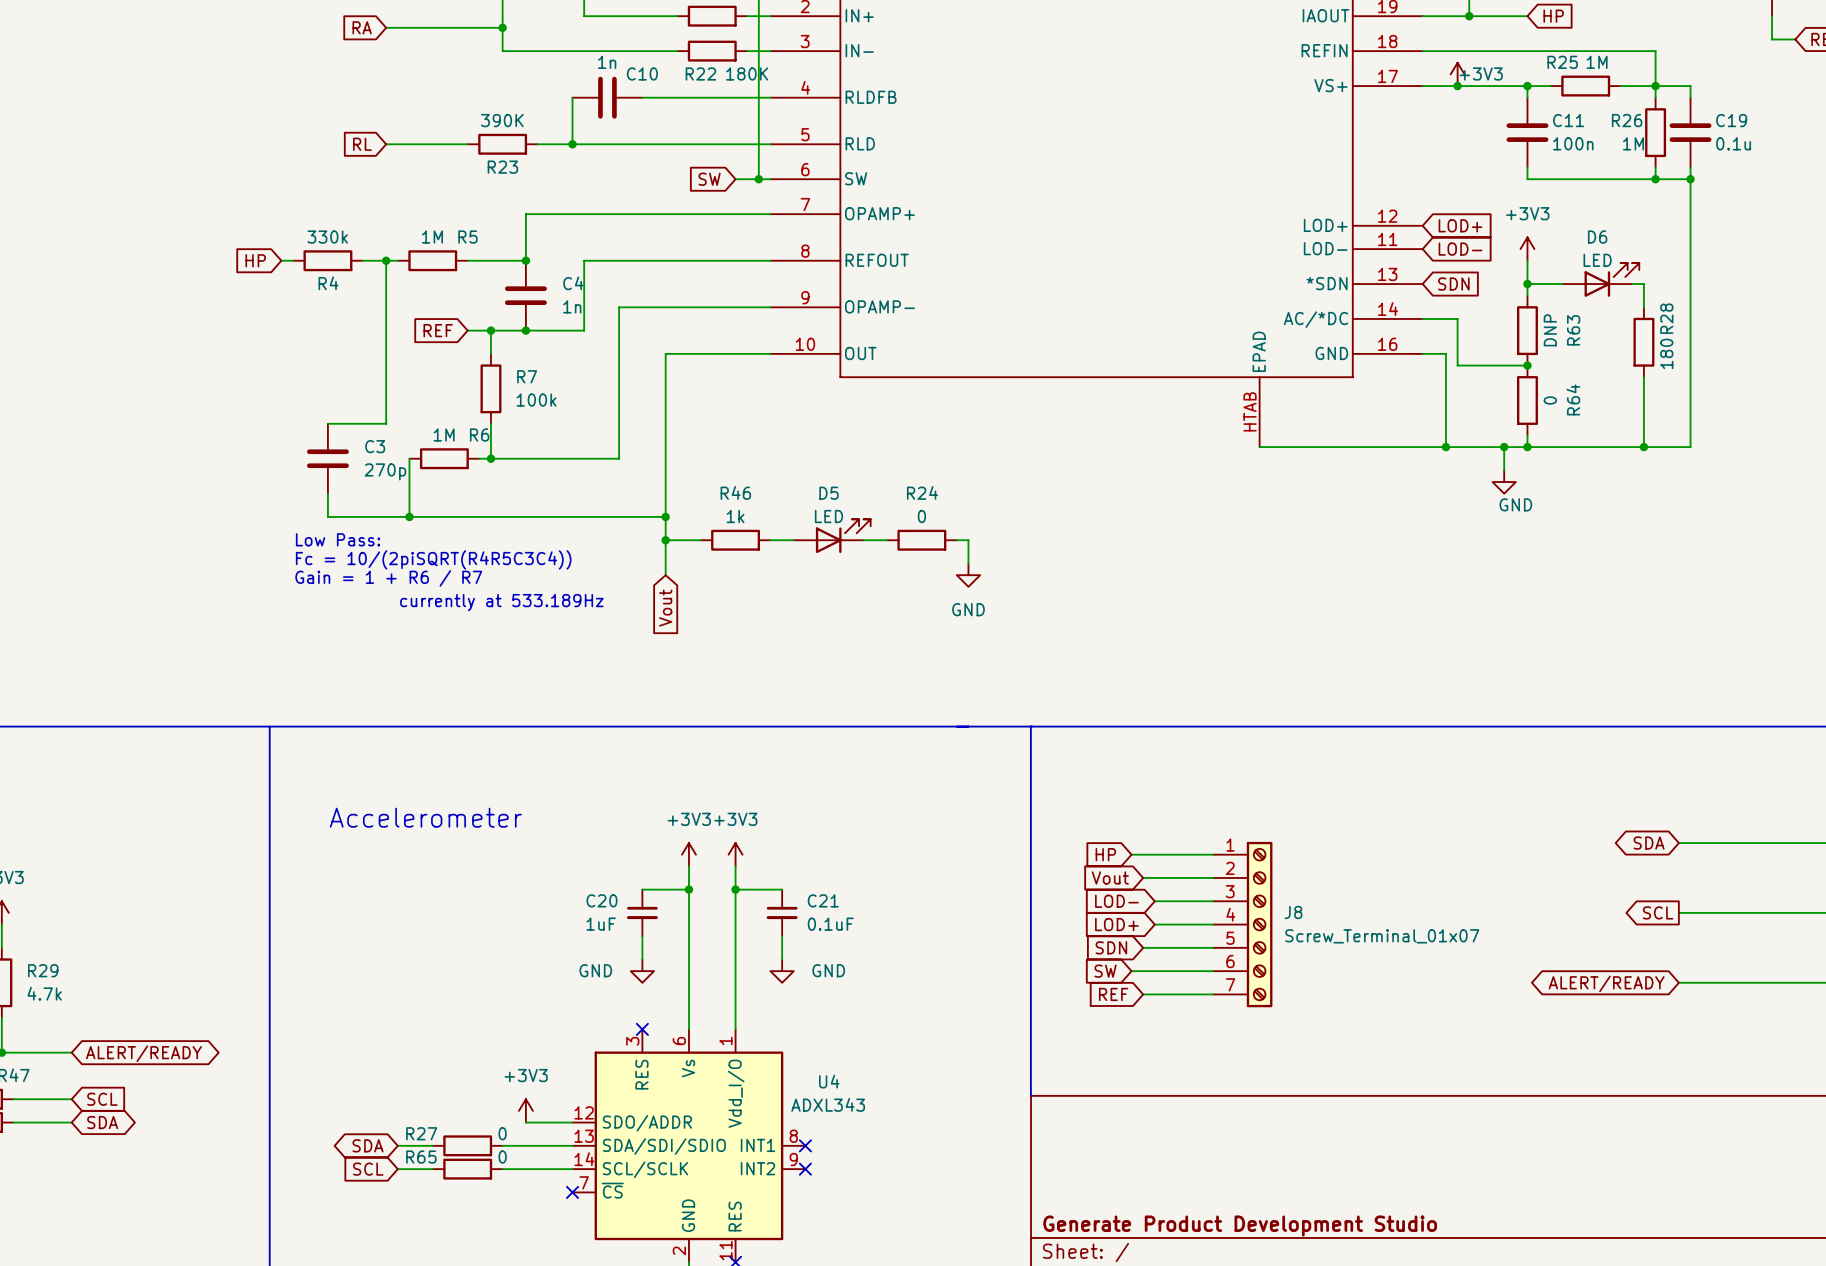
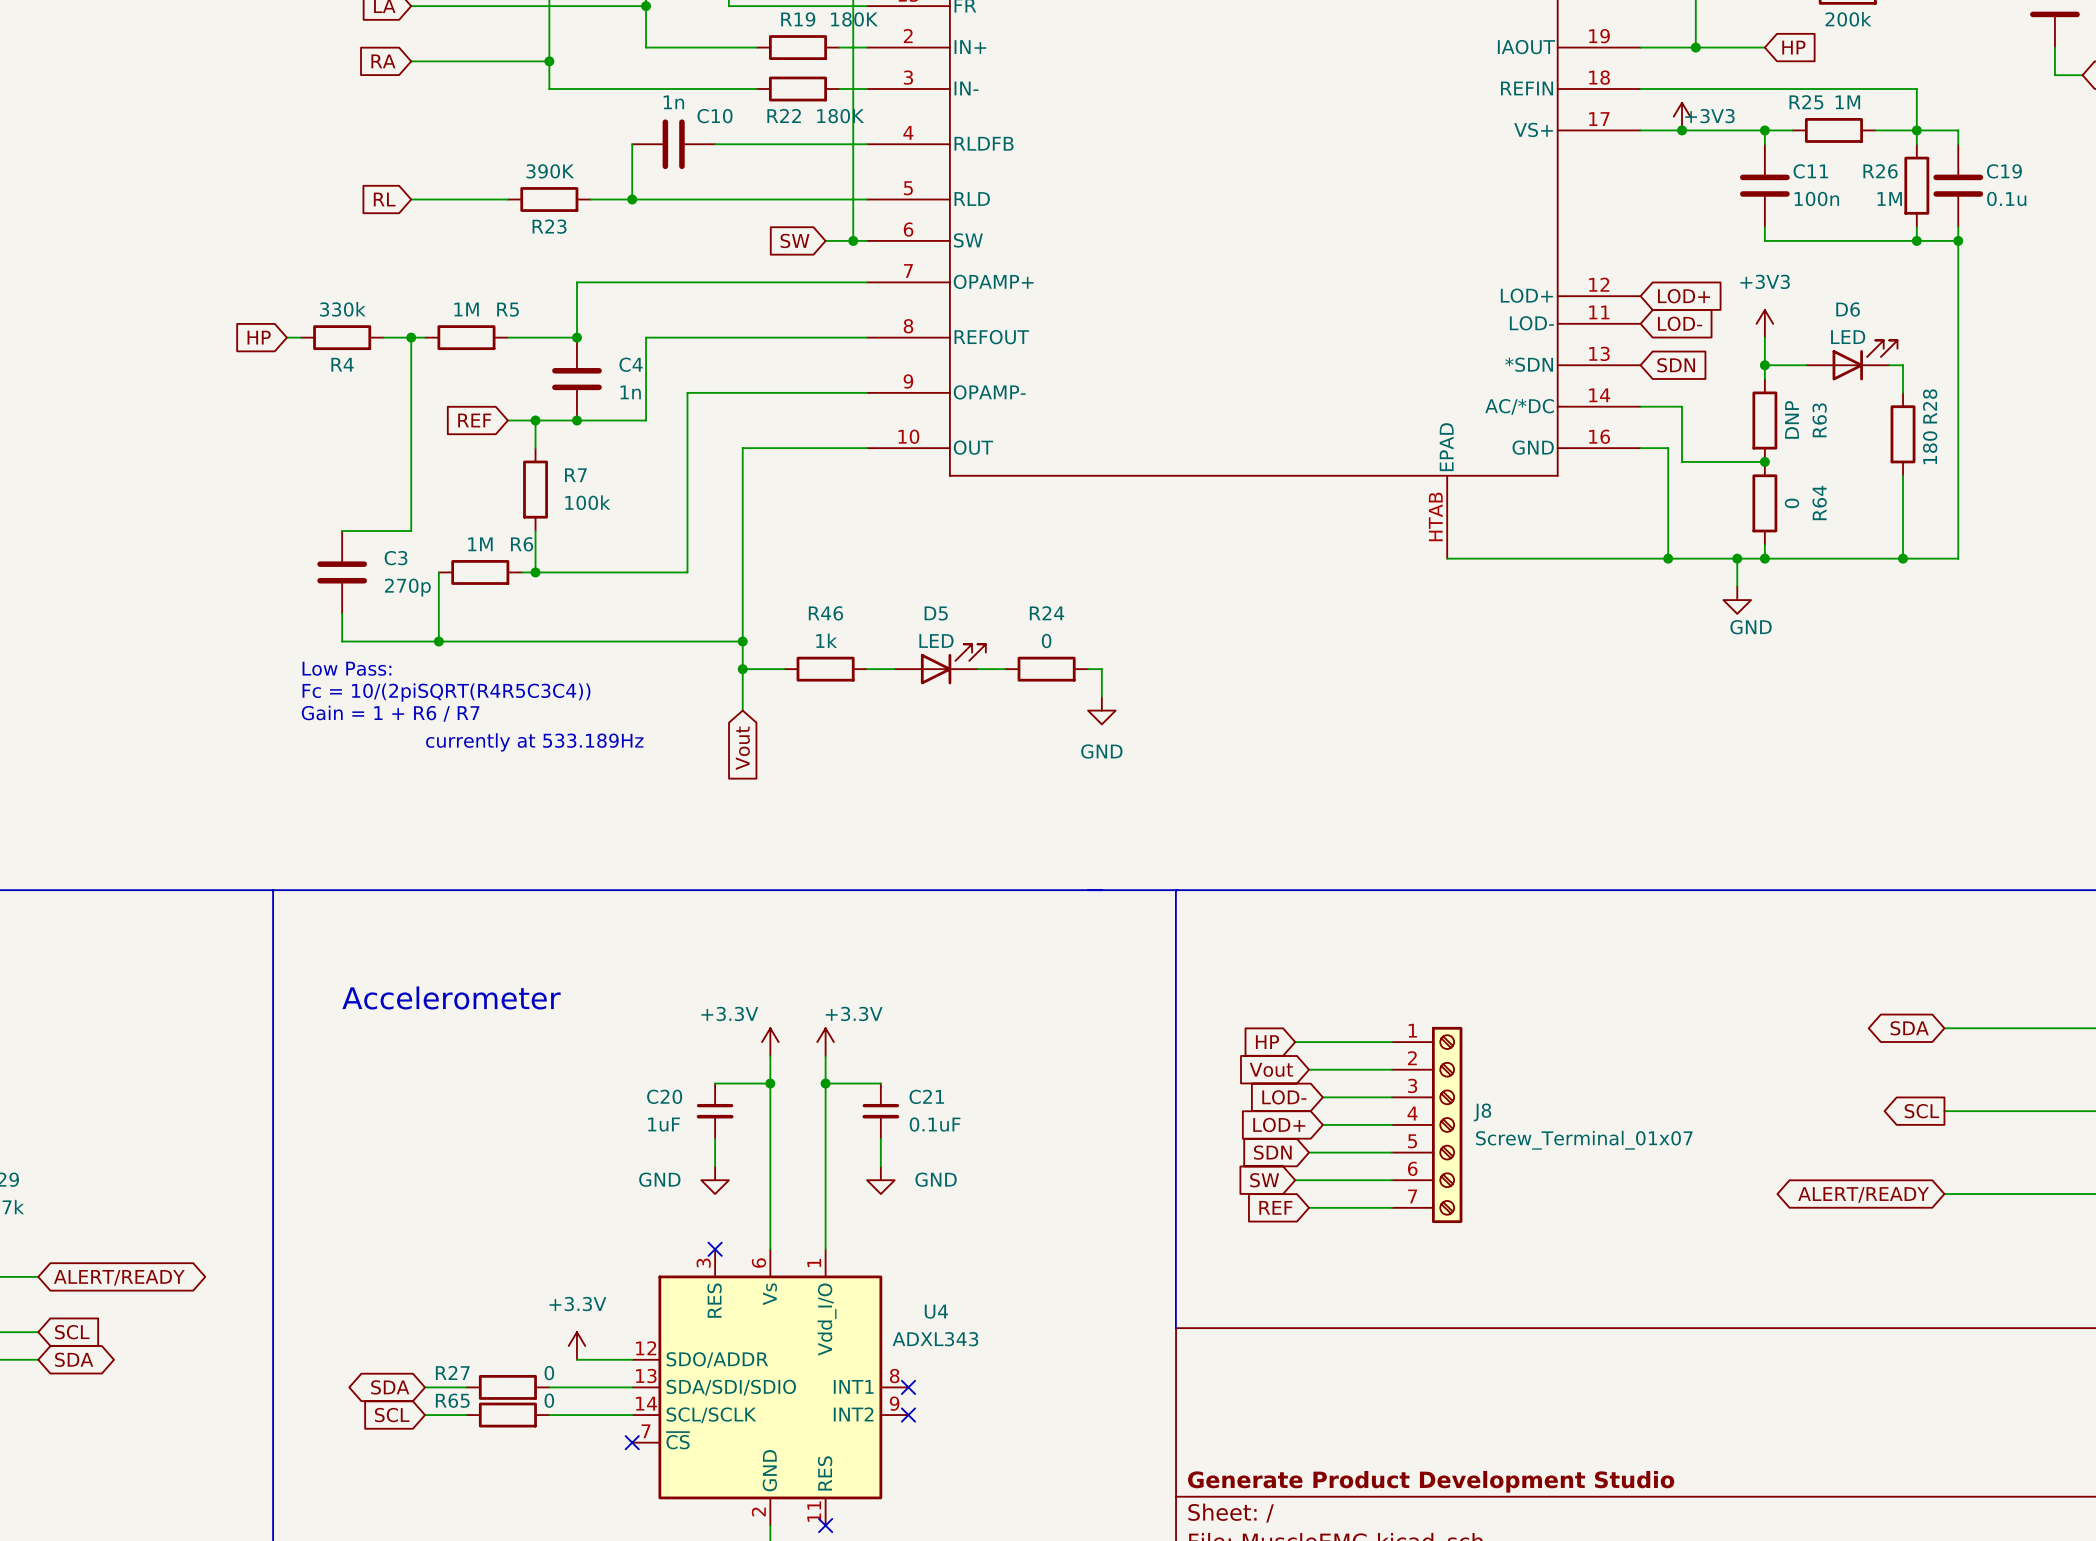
power symbol: +3V3 (688, 854) -> +3.3V (770, 1042)
power symbol: +3V3 (735, 854) -> +3.3V (825, 1042)
power symbol: +3V3 (525, 1110) -> +3.3V (576, 1345)

